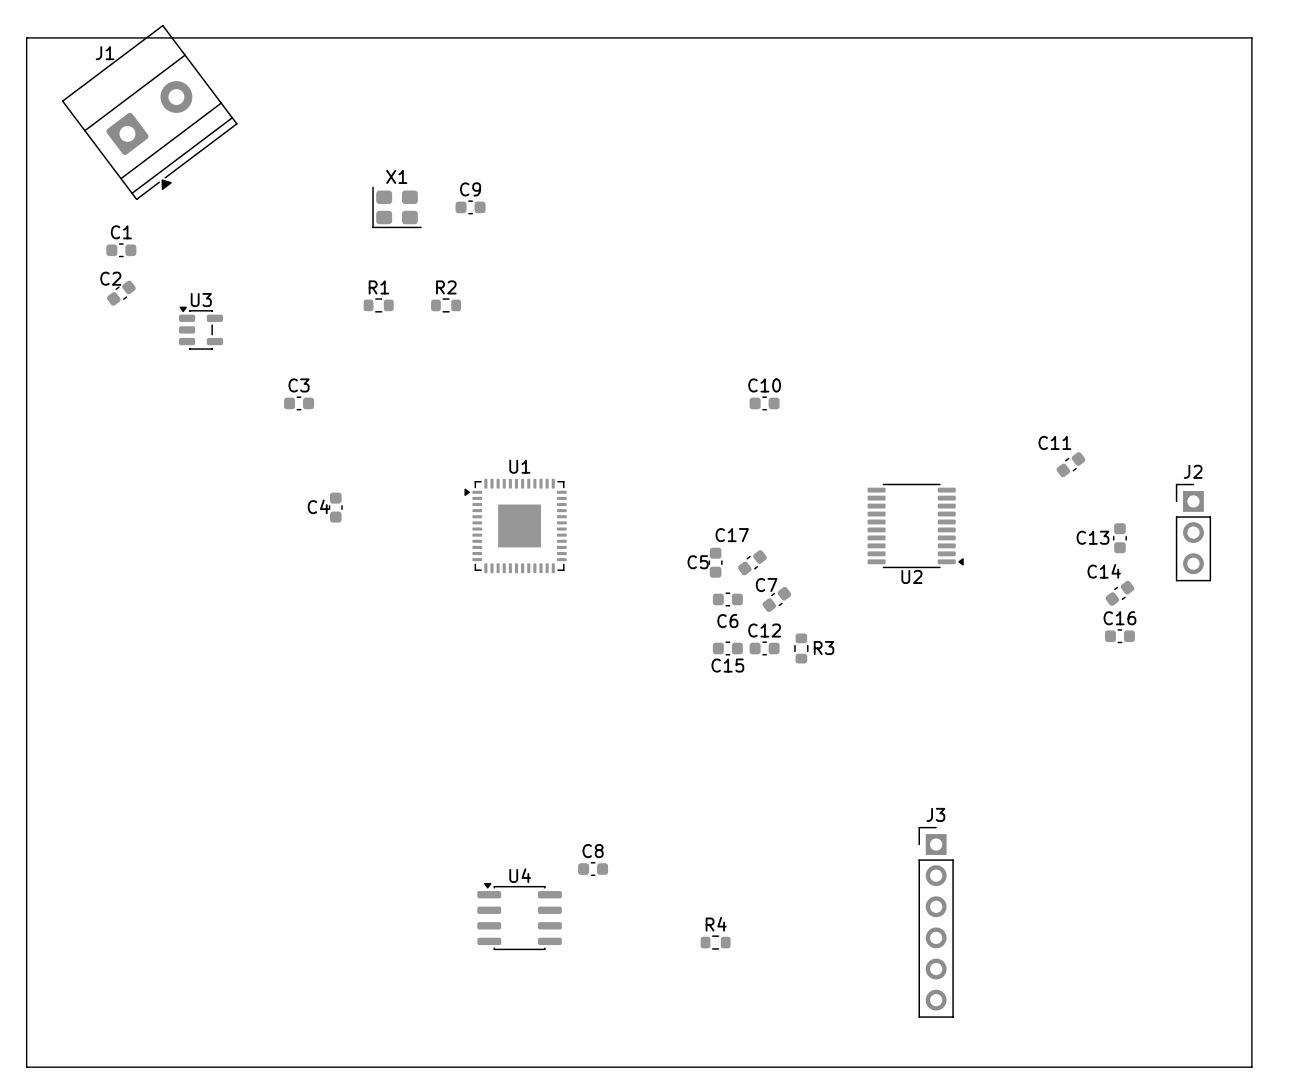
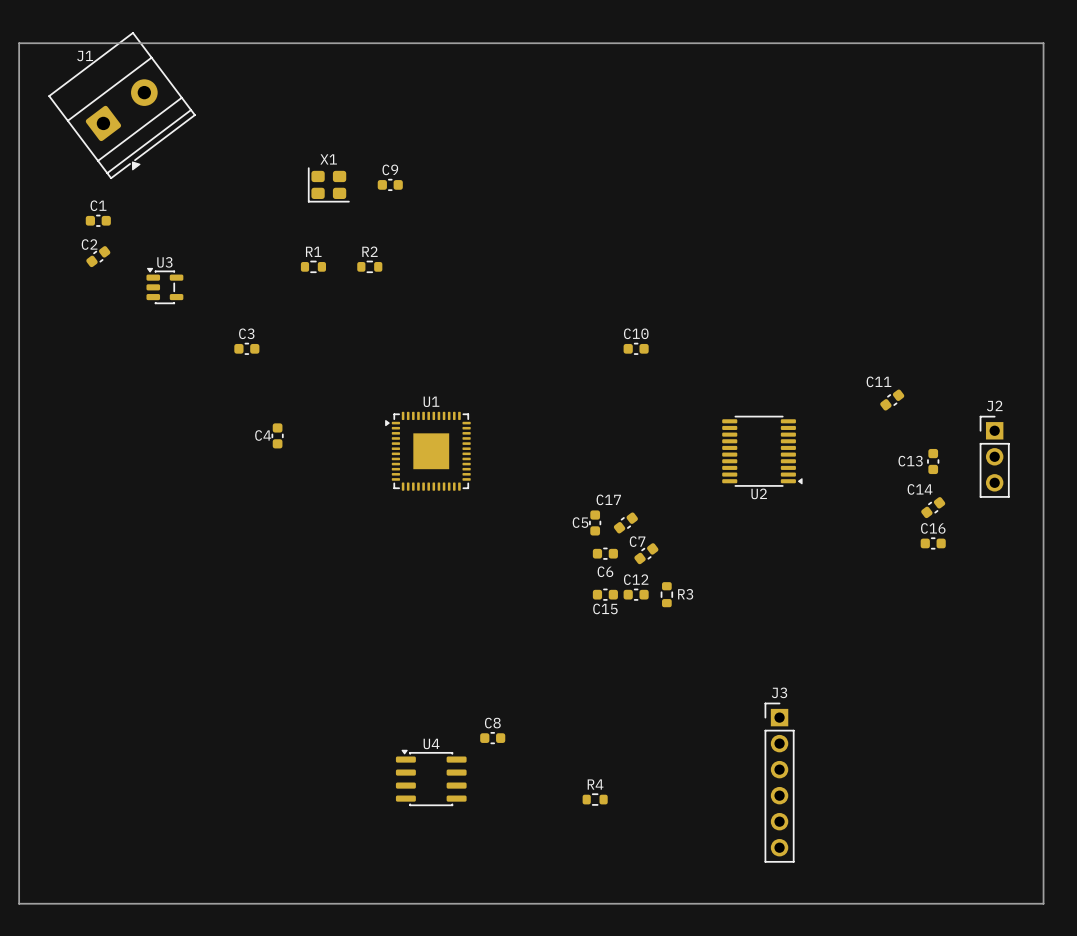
C5 position: (715, 562) -> (595, 522)
C17 position: (752, 562) -> (625, 522)
C6: (727, 599) -> none
C7 position: (776, 599) -> (646, 553)
C12 position: (764, 648) -> (636, 594)
R3 position: (801, 648) -> (666, 594)
C15 name: C15 (727, 665) -> C6 (605, 571)
C15: none -> (605, 594)

